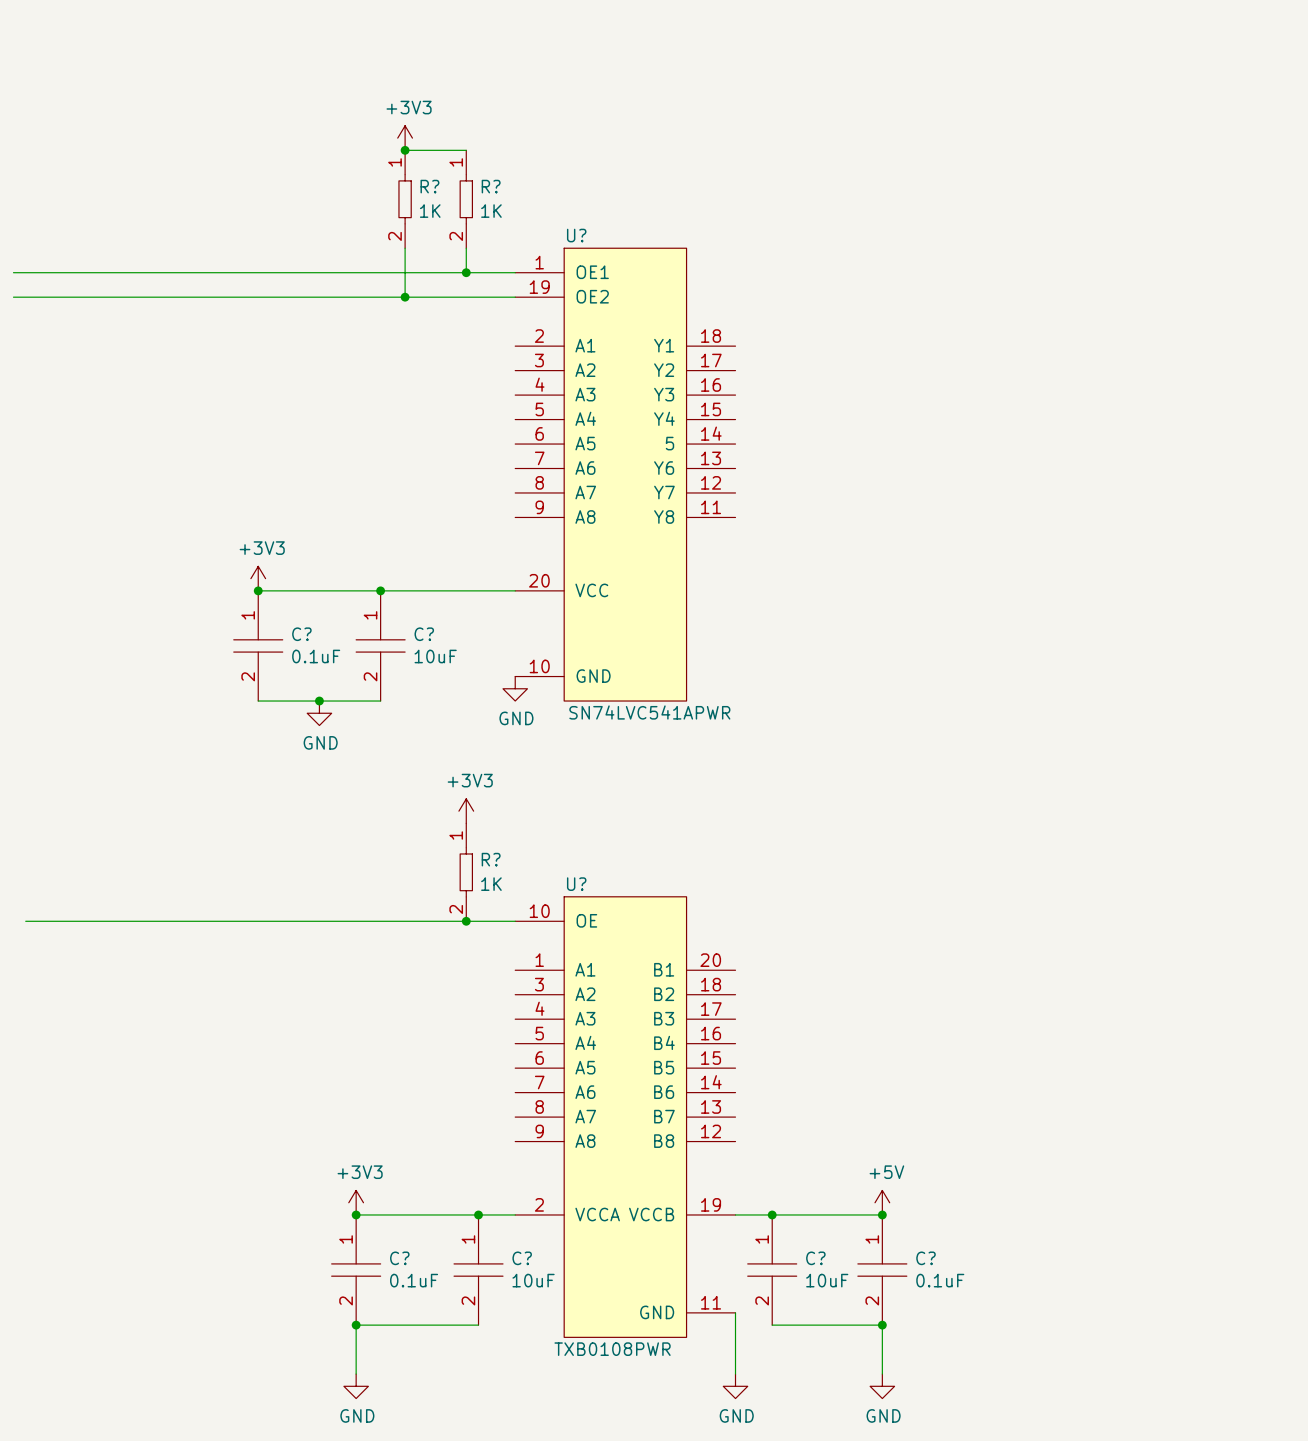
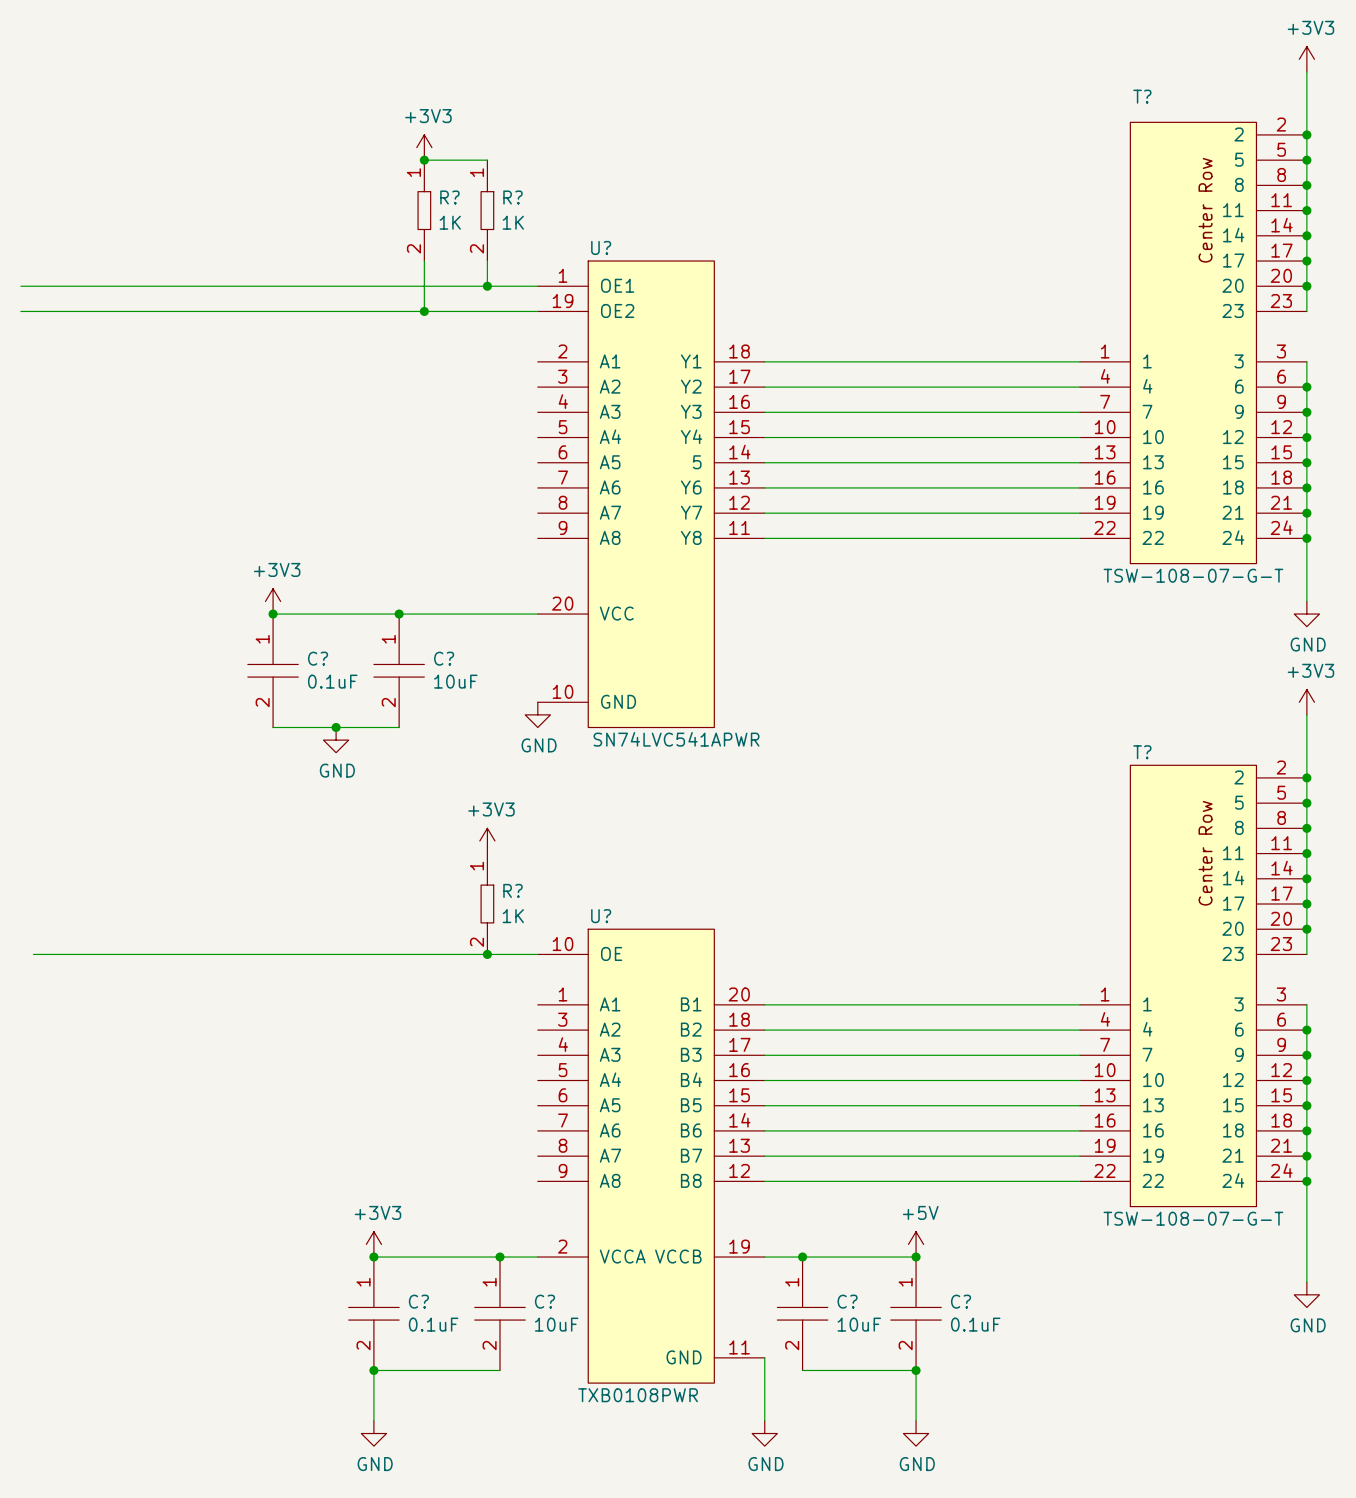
power symbol: none -> +3V3 (1306, 59)
wire: none -> (1306, 71) (1306, 311)
junction: none -> (1306, 134)
junction: none -> (1306, 160)
junction: none -> (1306, 185)
junction: none -> (1306, 210)
junction: none -> (1306, 235)
junction: none -> (1306, 261)
junction: none -> (1306, 286)
T?: none -> TSW-108-07-G-T (1193, 342)
wire: none -> (764, 361) (1079, 361)
wire: none -> (1306, 361) (1306, 601)
wire: none -> (764, 387) (1079, 387)
junction: none -> (1306, 387)
wire: none -> (764, 412) (1079, 412)
junction: none -> (1306, 412)
wire: none -> (764, 437) (1079, 437)
junction: none -> (1306, 437)
wire: none -> (764, 462) (1079, 462)
junction: none -> (1306, 462)
wire: none -> (764, 487) (1079, 487)
junction: none -> (1306, 487)
wire: none -> (764, 513) (1079, 513)
junction: none -> (1306, 513)
wire: none -> (764, 538) (1079, 538)
junction: none -> (1306, 538)
power symbol: none -> GND (1306, 614)
power symbol: none -> +3V3 (1306, 702)
wire: none -> (1306, 714) (1306, 954)
junction: none -> (1306, 777)
junction: none -> (1306, 803)
junction: none -> (1306, 828)
junction: none -> (1306, 853)
junction: none -> (1306, 878)
junction: none -> (1306, 904)
junction: none -> (1306, 929)
T?: none -> TSW-108-07-G-T (1193, 985)
wire: none -> (764, 1004) (1079, 1004)
wire: none -> (1306, 1004) (1306, 1282)
wire: none -> (764, 1030) (1079, 1030)
junction: none -> (1306, 1030)
wire: none -> (764, 1055) (1079, 1055)
junction: none -> (1306, 1055)
wire: none -> (764, 1080) (1079, 1080)
junction: none -> (1306, 1080)
wire: none -> (764, 1105) (1079, 1105)
junction: none -> (1306, 1105)
wire: none -> (764, 1130) (1079, 1130)
junction: none -> (1306, 1130)
wire: none -> (764, 1156) (1079, 1156)
junction: none -> (1306, 1156)
wire: none -> (764, 1181) (1079, 1181)
junction: none -> (1306, 1181)
power symbol: none -> GND (1306, 1294)

